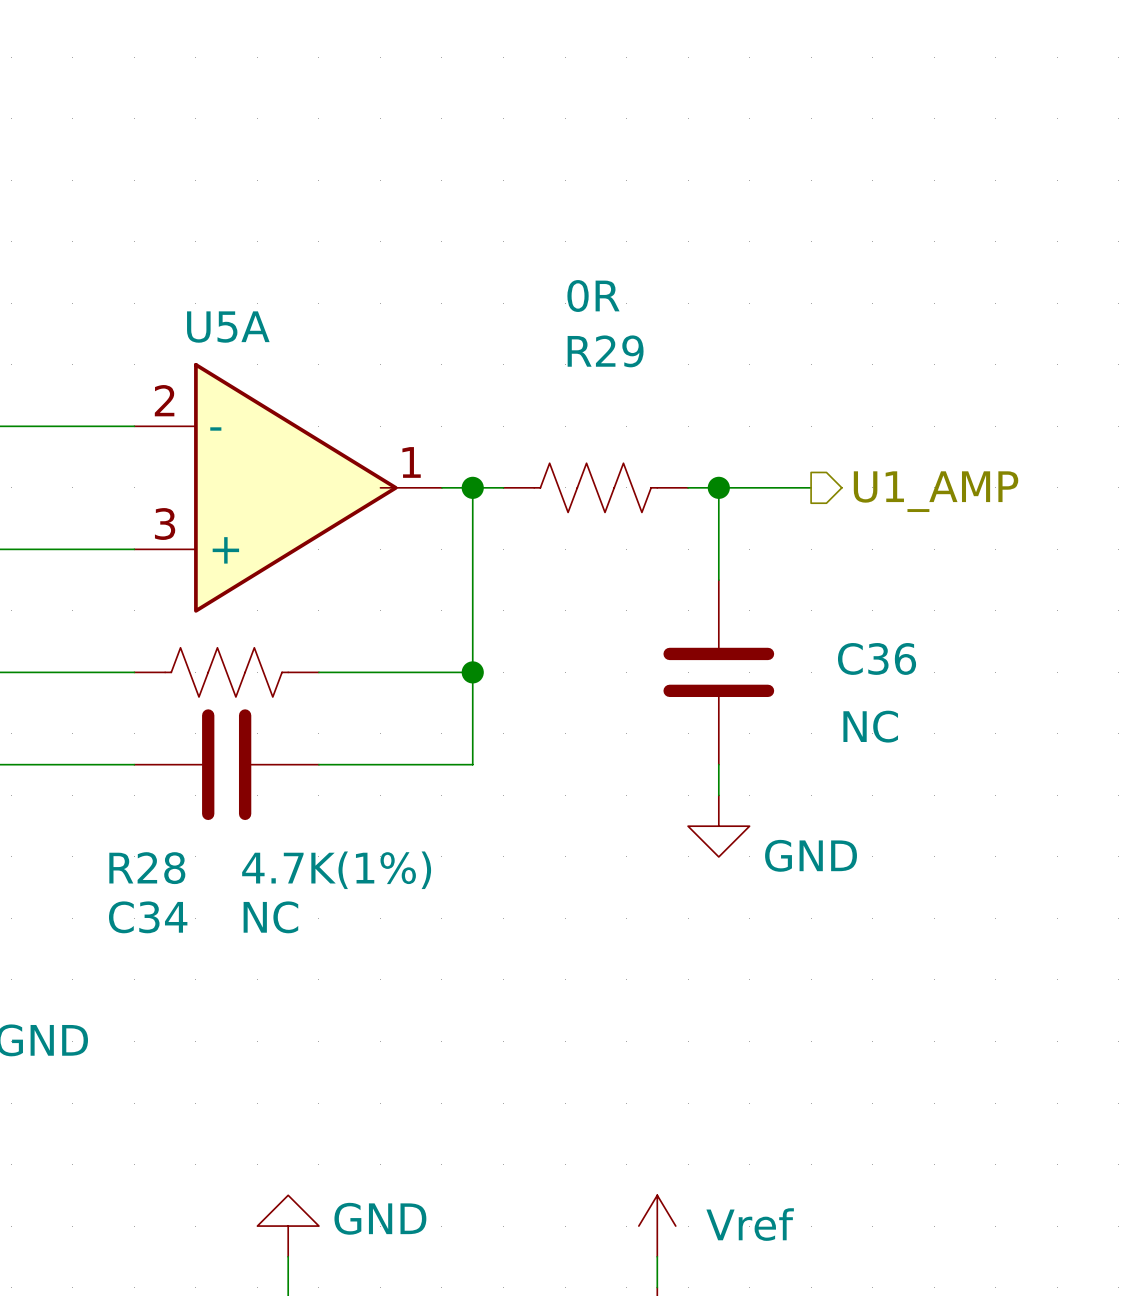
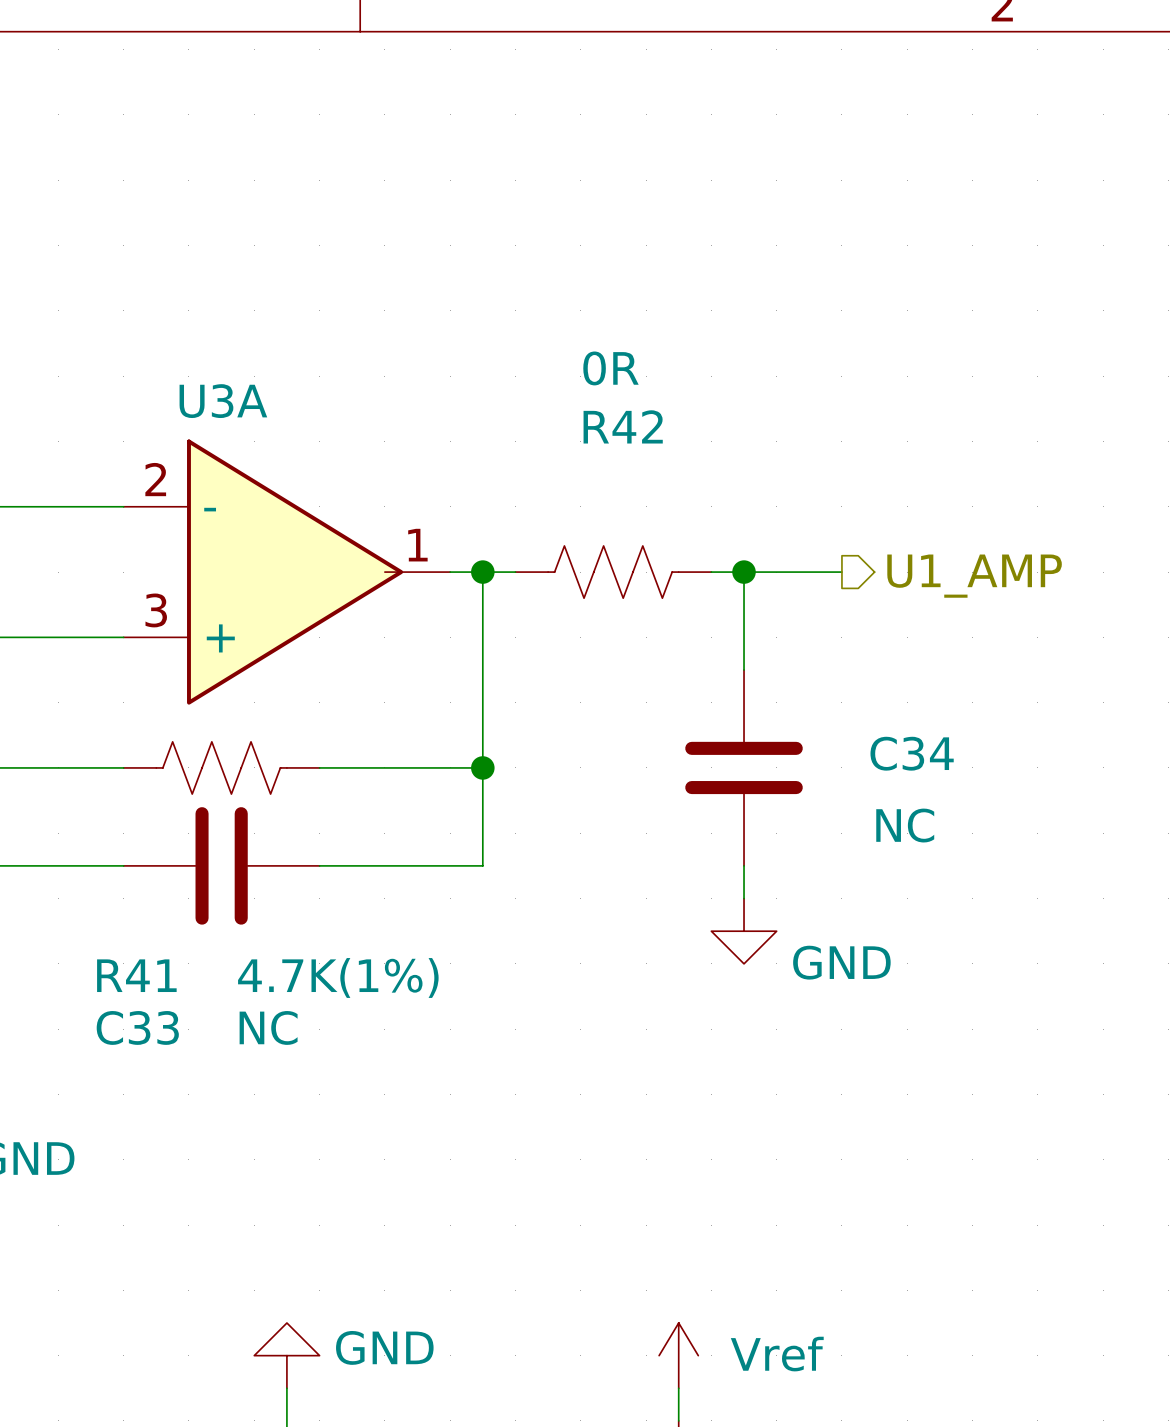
U5A name: U5A (228, 327) -> U3A (223, 401)
R29 name: R29 (605, 351) -> R42 (623, 426)
C36 name: C36 (877, 658) -> C34 (912, 753)
R28 name: R28 (147, 868) -> R41 (136, 975)
C34 name: C34 (148, 917) -> C33 (137, 1027)

